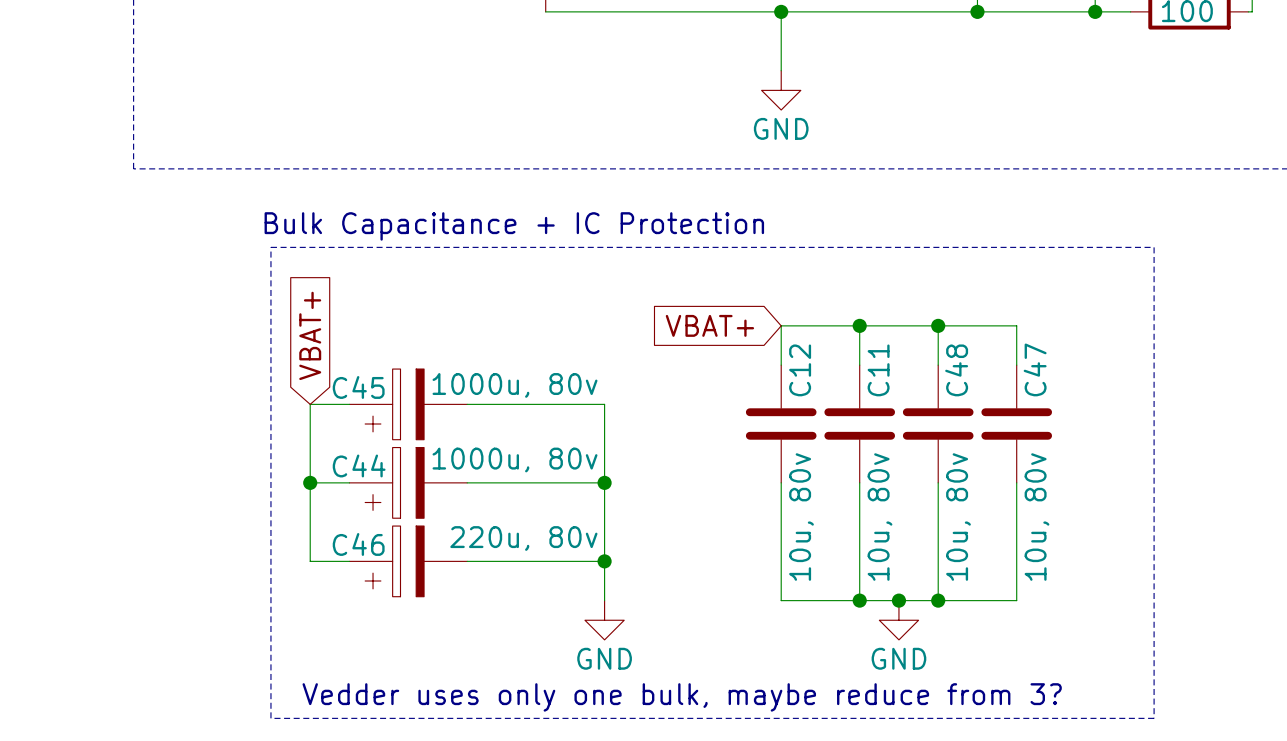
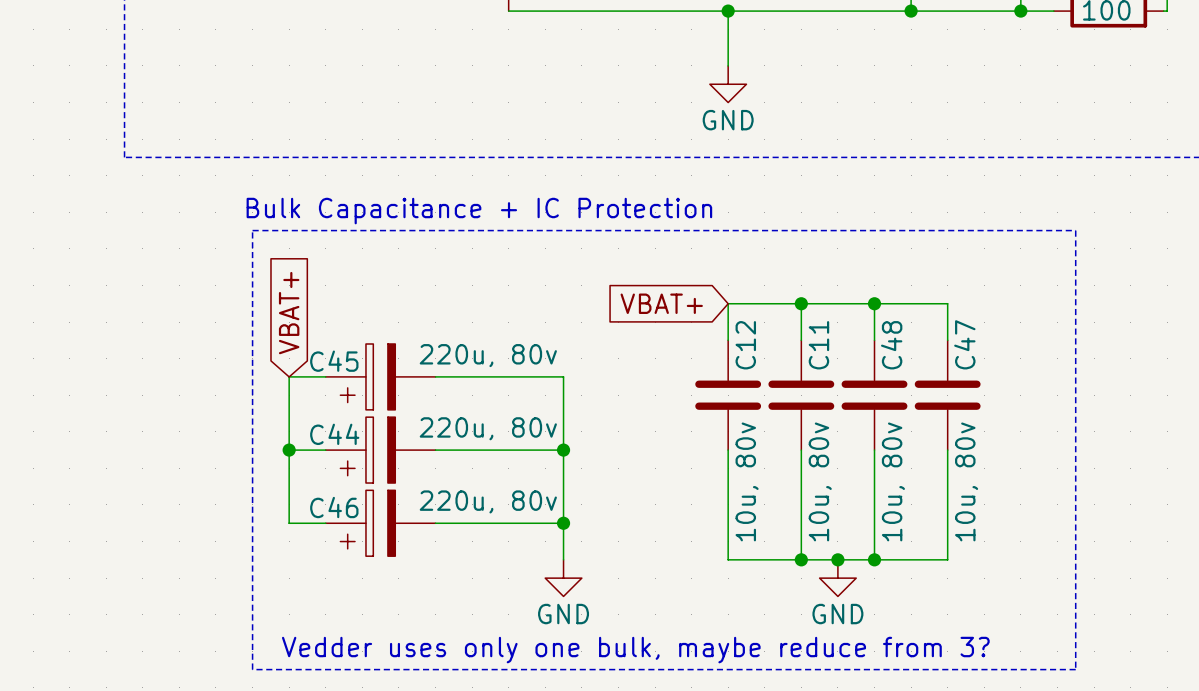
C45 value: 1000u, 80v (515, 385) -> 220u, 80v (488, 355)
C44 value: 1000u, 80v (515, 459) -> 220u, 80v (488, 428)

